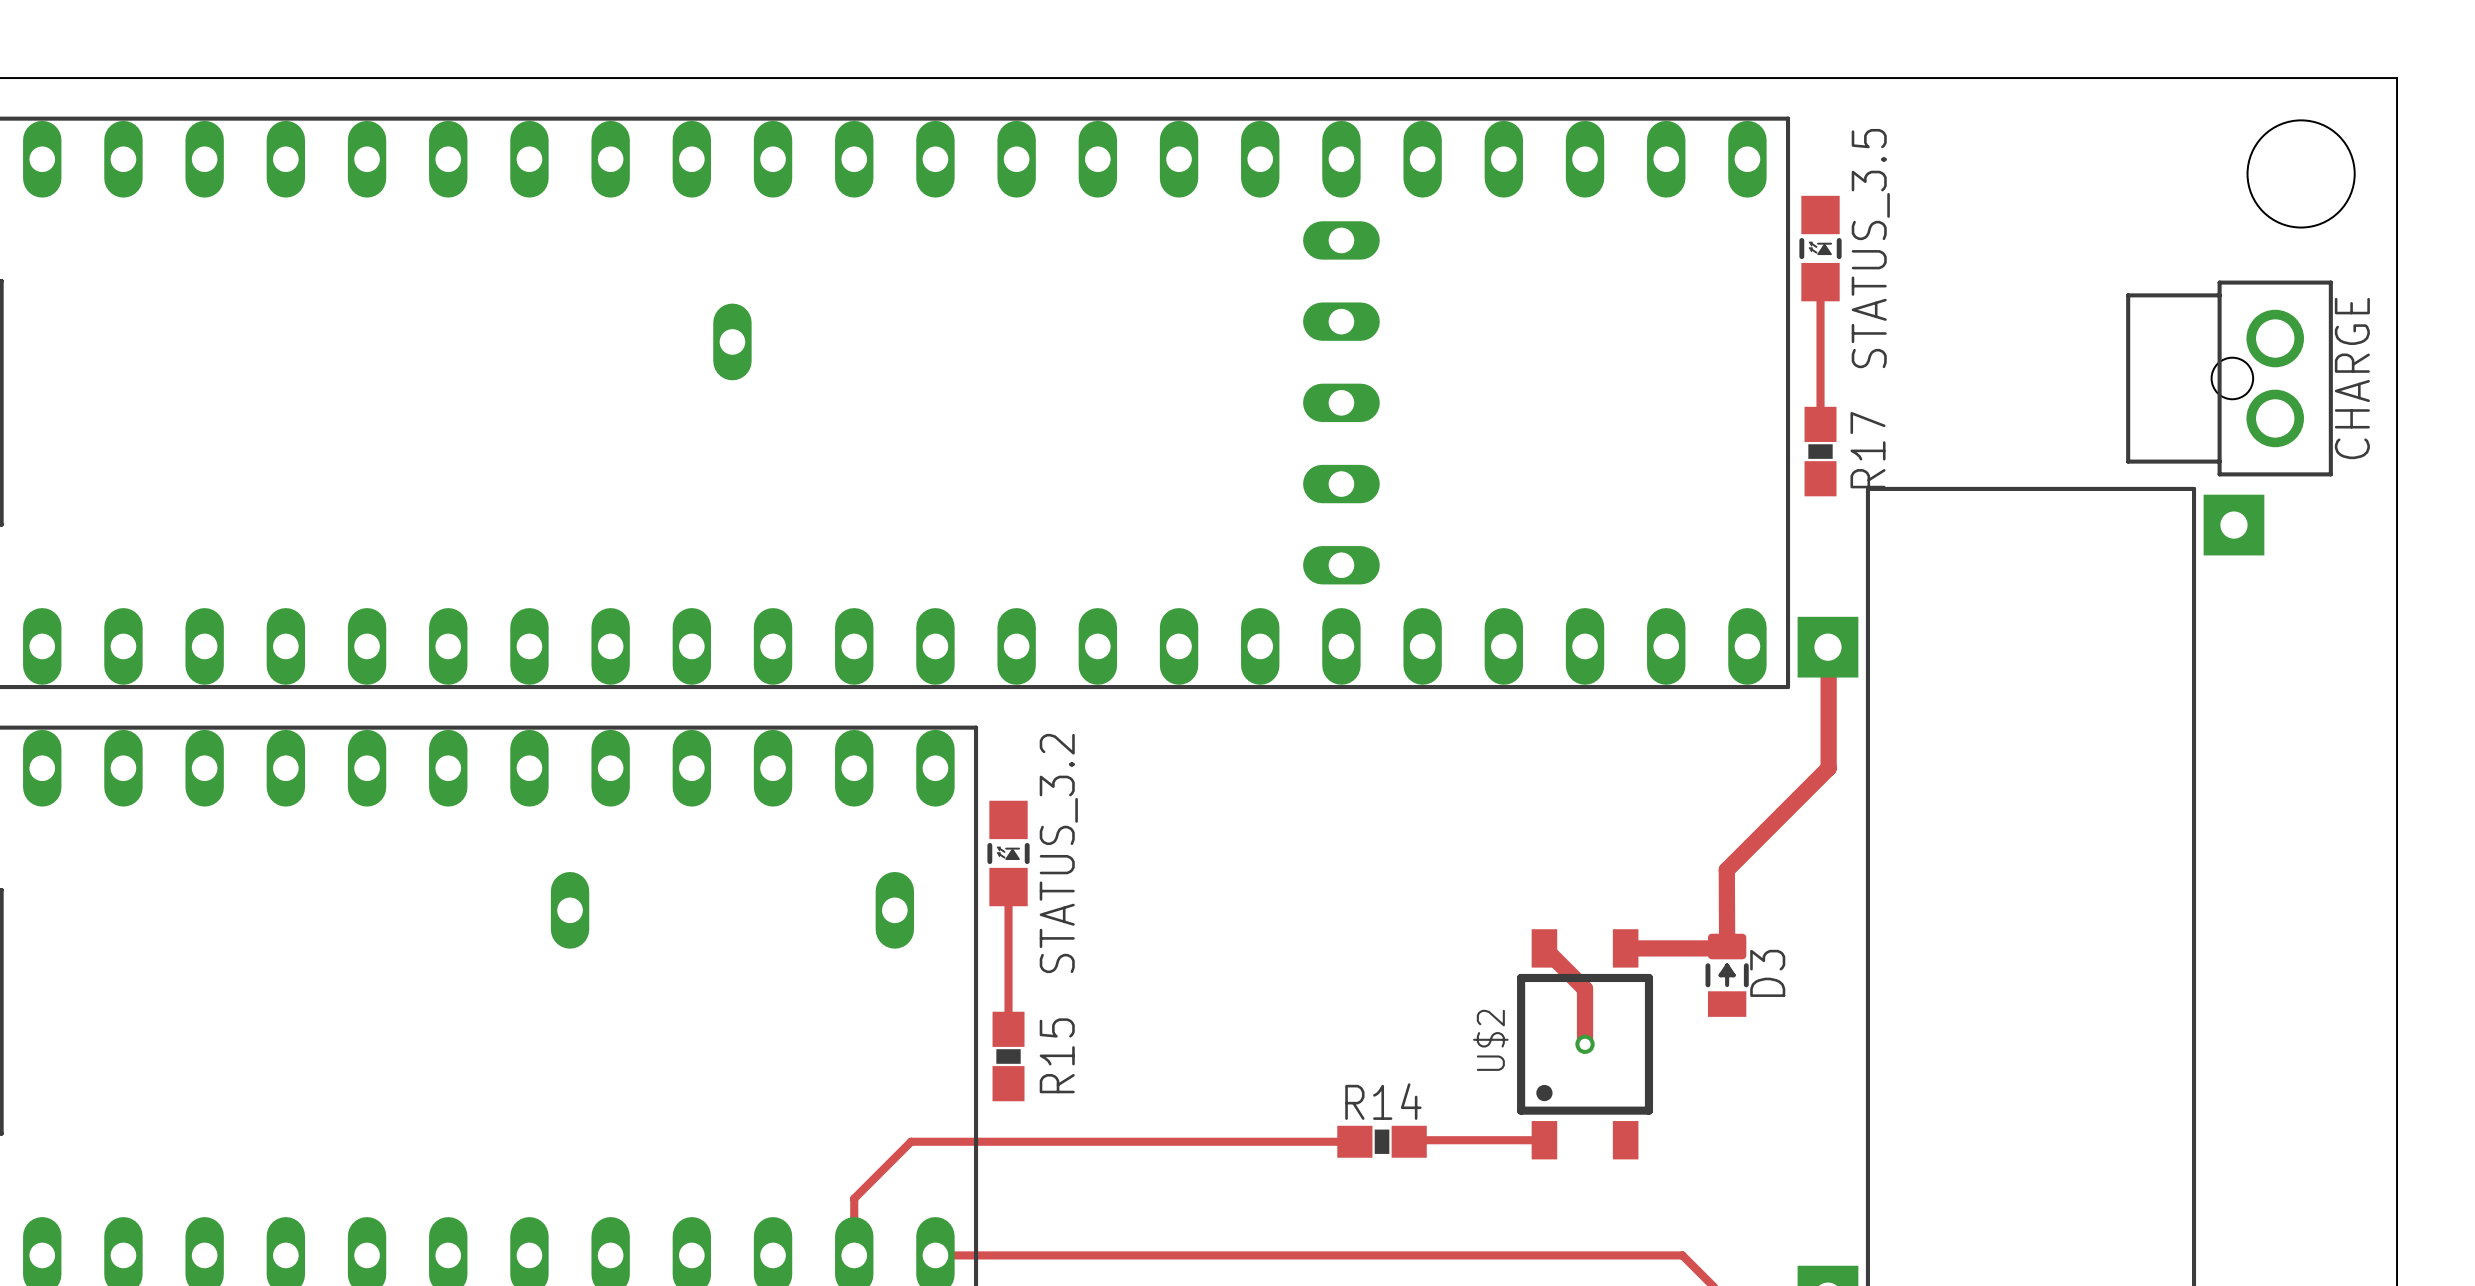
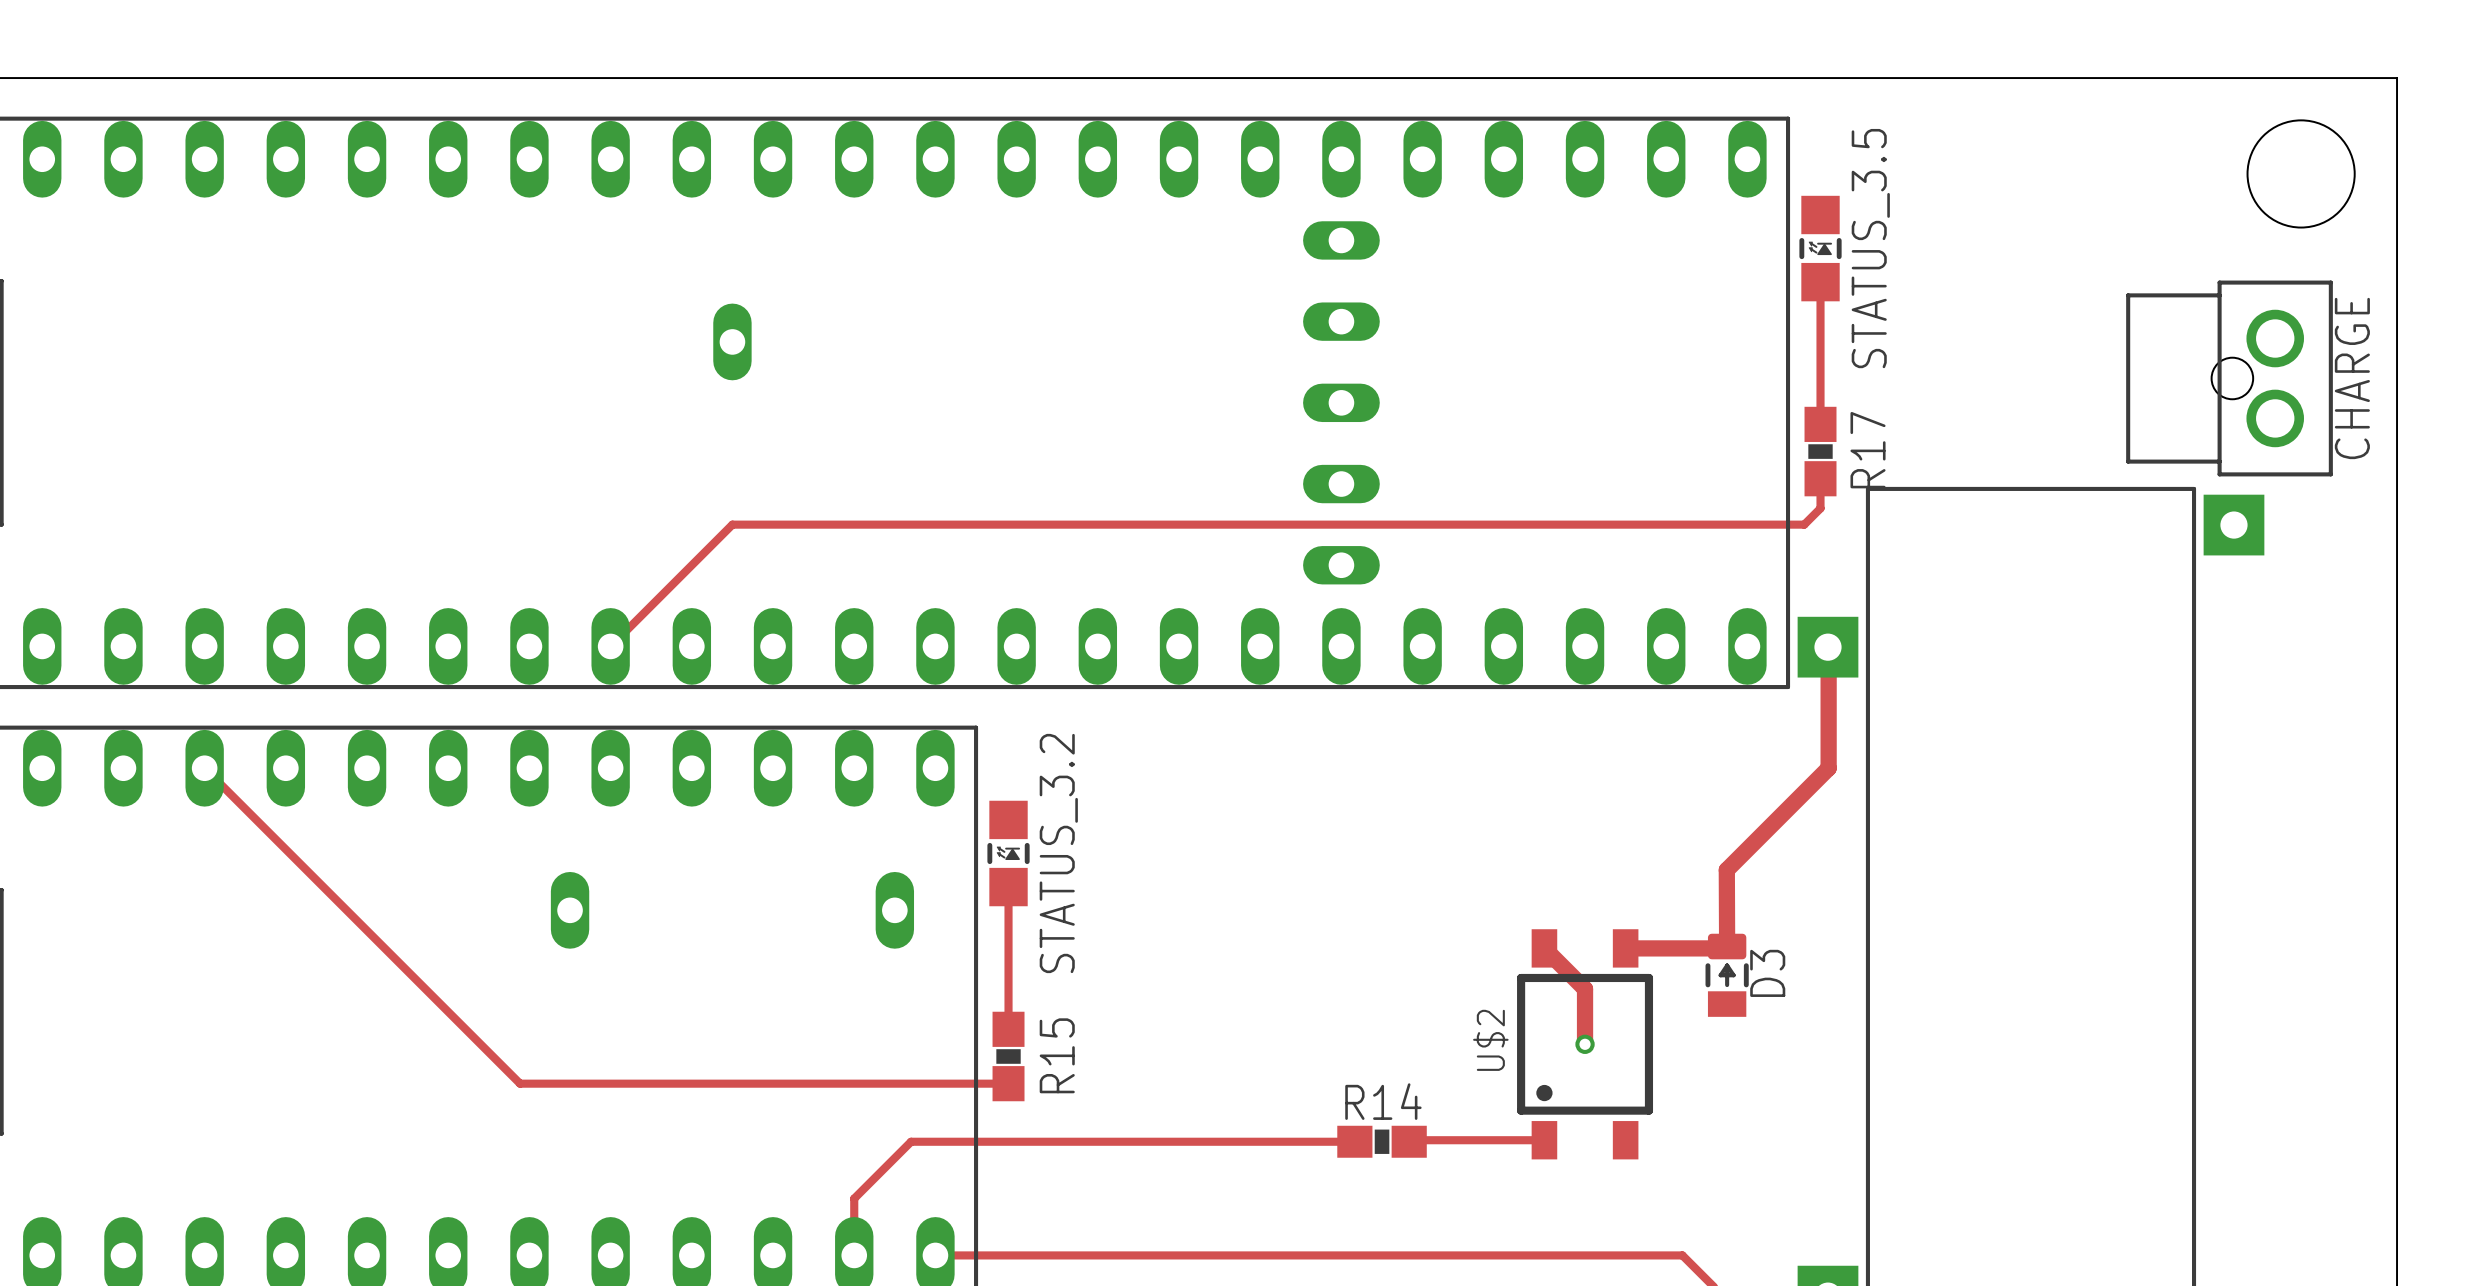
track: none -> (1820, 478) (1820, 508) (1804, 524) (732, 524) (610, 646)
track: none -> (204, 768) (520, 1083) (1008, 1083)

